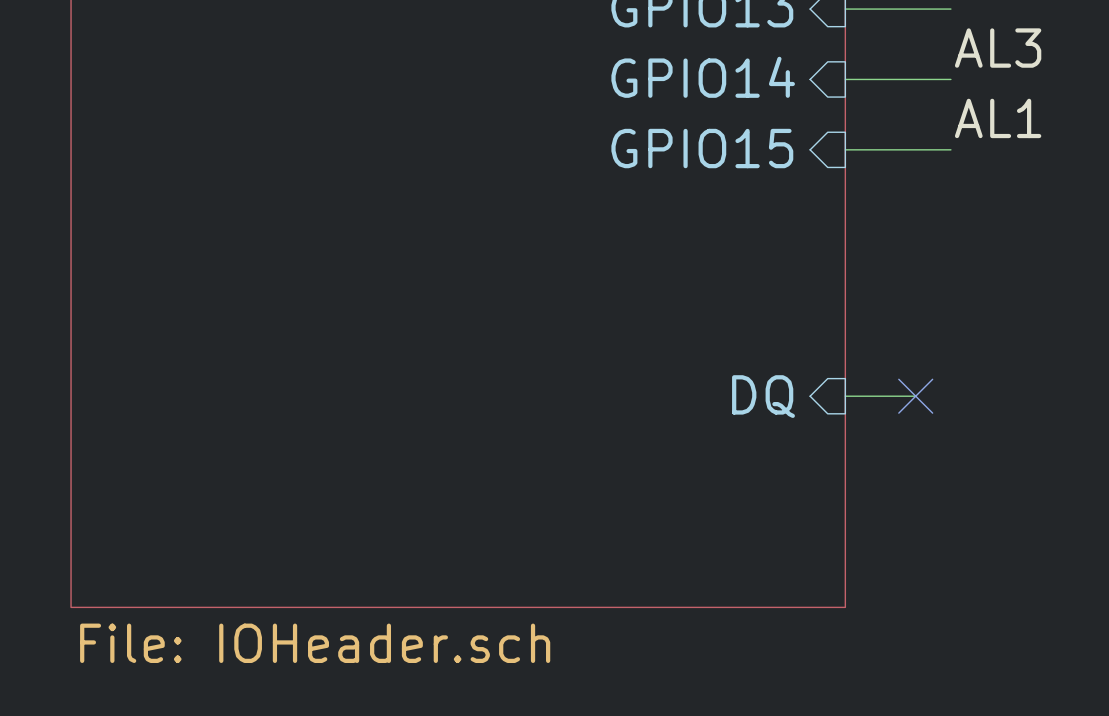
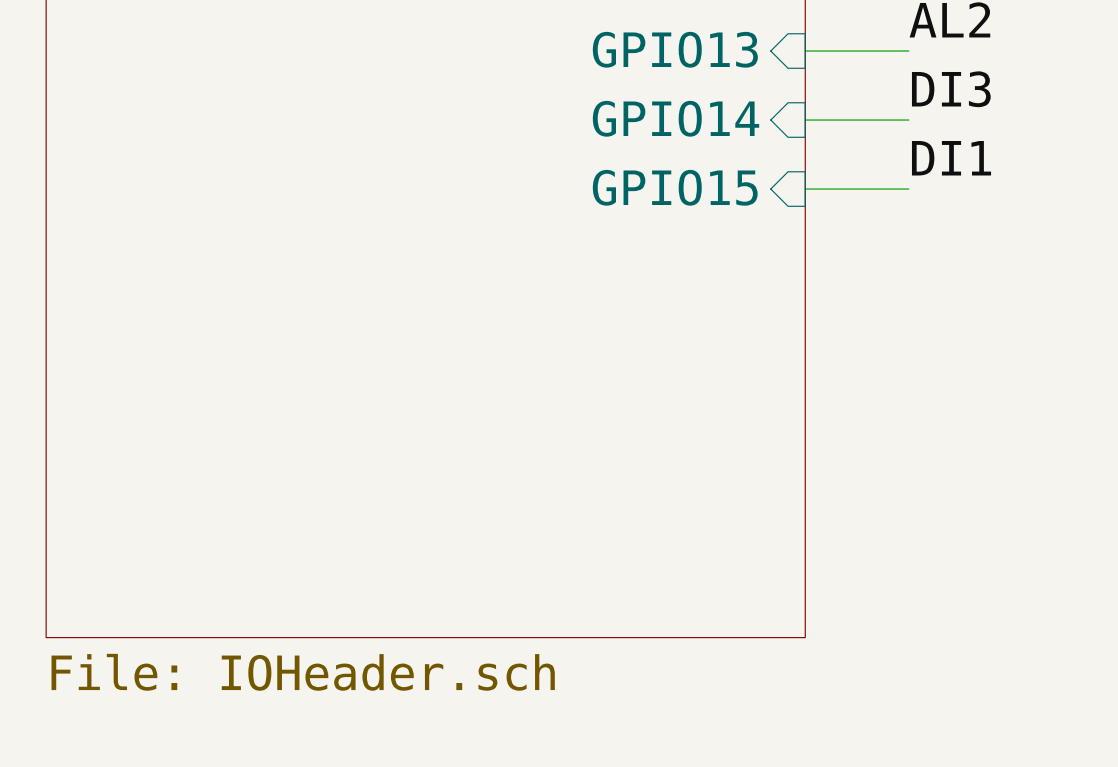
label: AL3 (998, 48) -> DI3 (951, 89)
label: AL1 (998, 118) -> DI1 (951, 158)
sheet pin: DQ (763, 396) -> none
wire: (845, 396) (915, 396) -> none
no-connect mark: (915, 396) -> none

